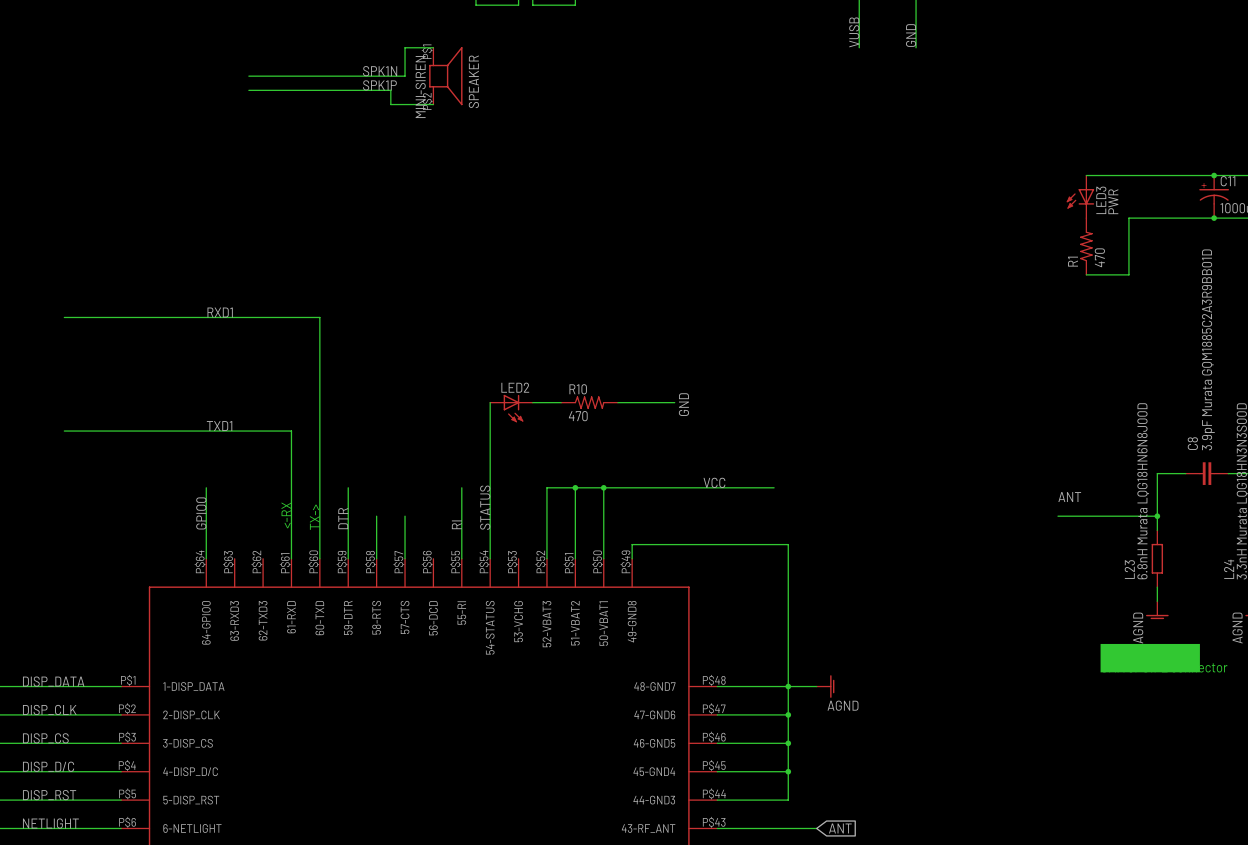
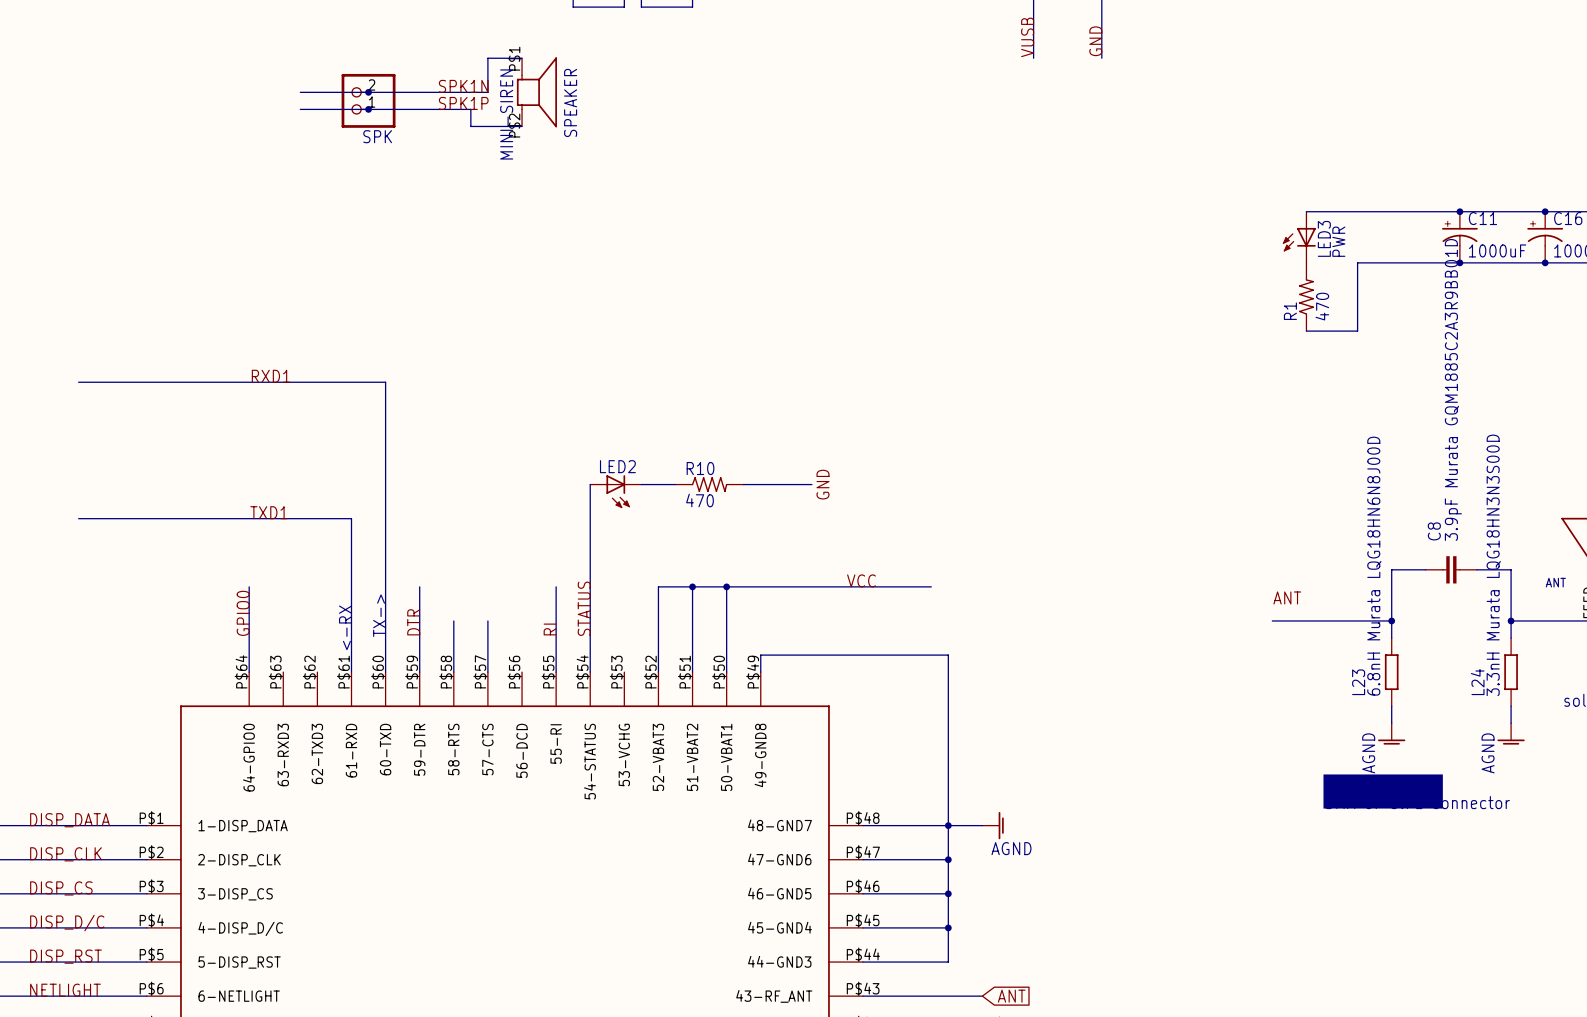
junction: none -> (368, 92)
SPK: none -> (368, 100)
junction: none -> (368, 109)

